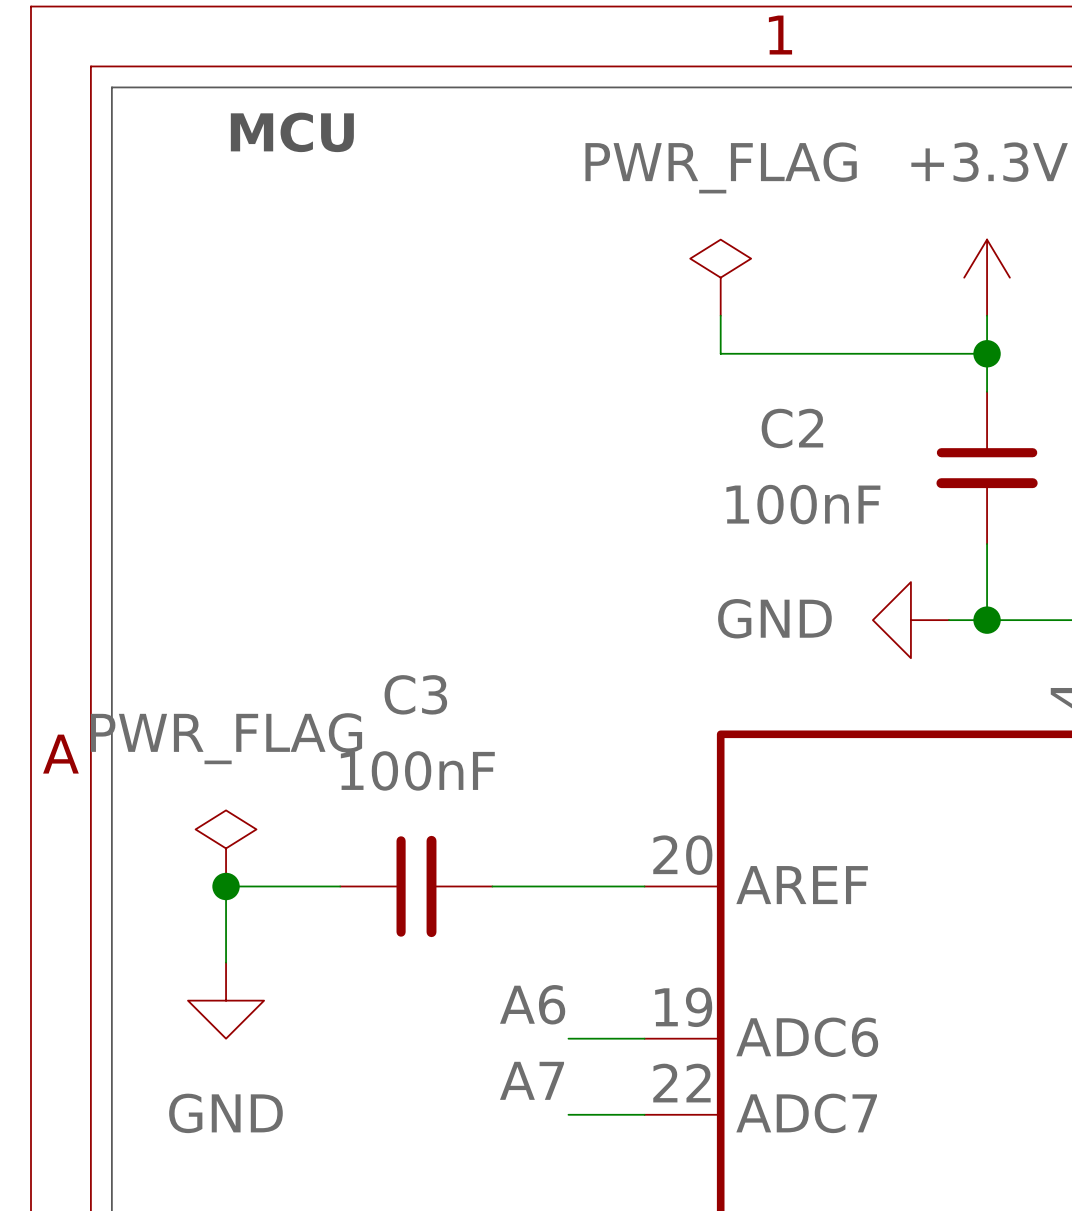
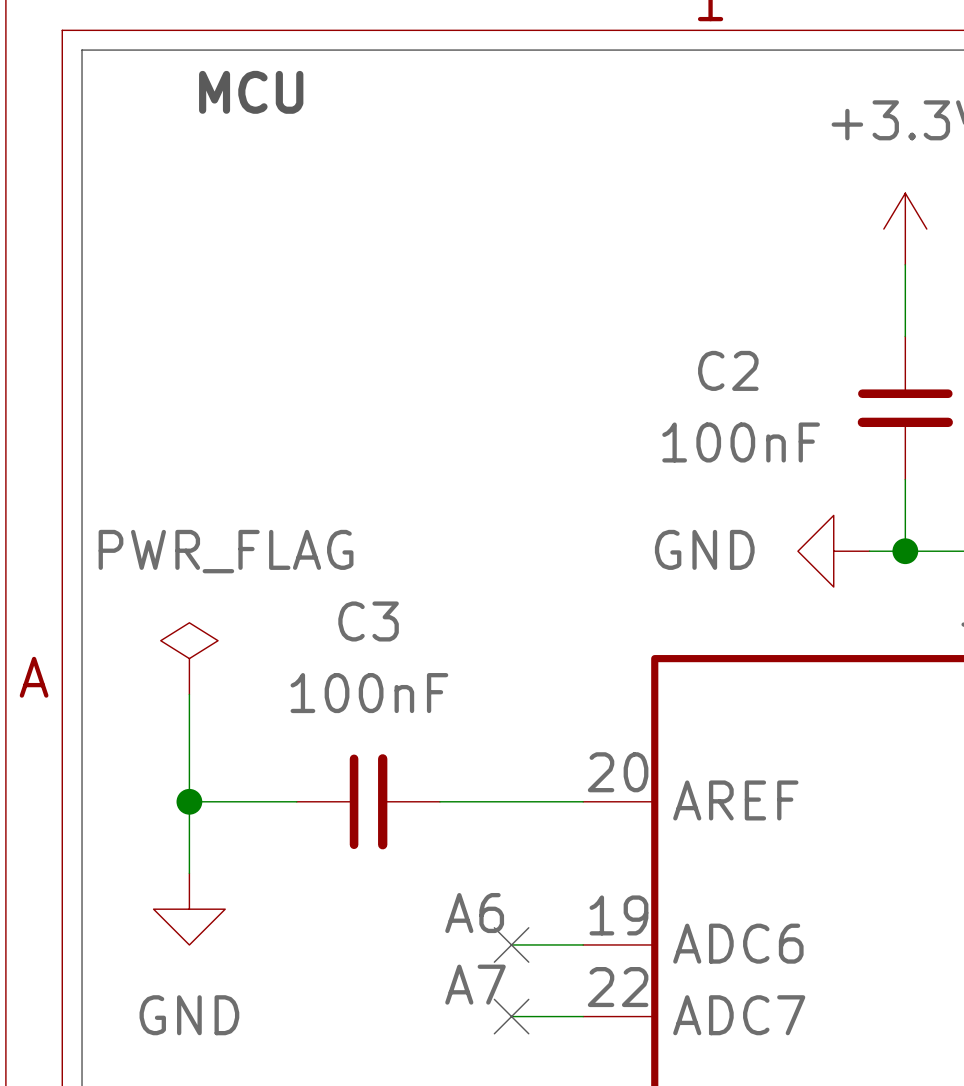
power symbol: PWR_FLAG (720, 277) -> none
wire: (720, 315) (720, 353) (987, 353) -> none
junction: (987, 353) -> none
power symbol text position: PWR_FLAG (226, 738) -> PWR_FLAG (226, 551)
wire: none -> (189, 694) (189, 801)
power symbol position: PWR_FLAG (226, 848) -> PWR_FLAG (189, 658)
no-connect mark: none -> (511, 944)
no-connect mark: none -> (511, 1016)

